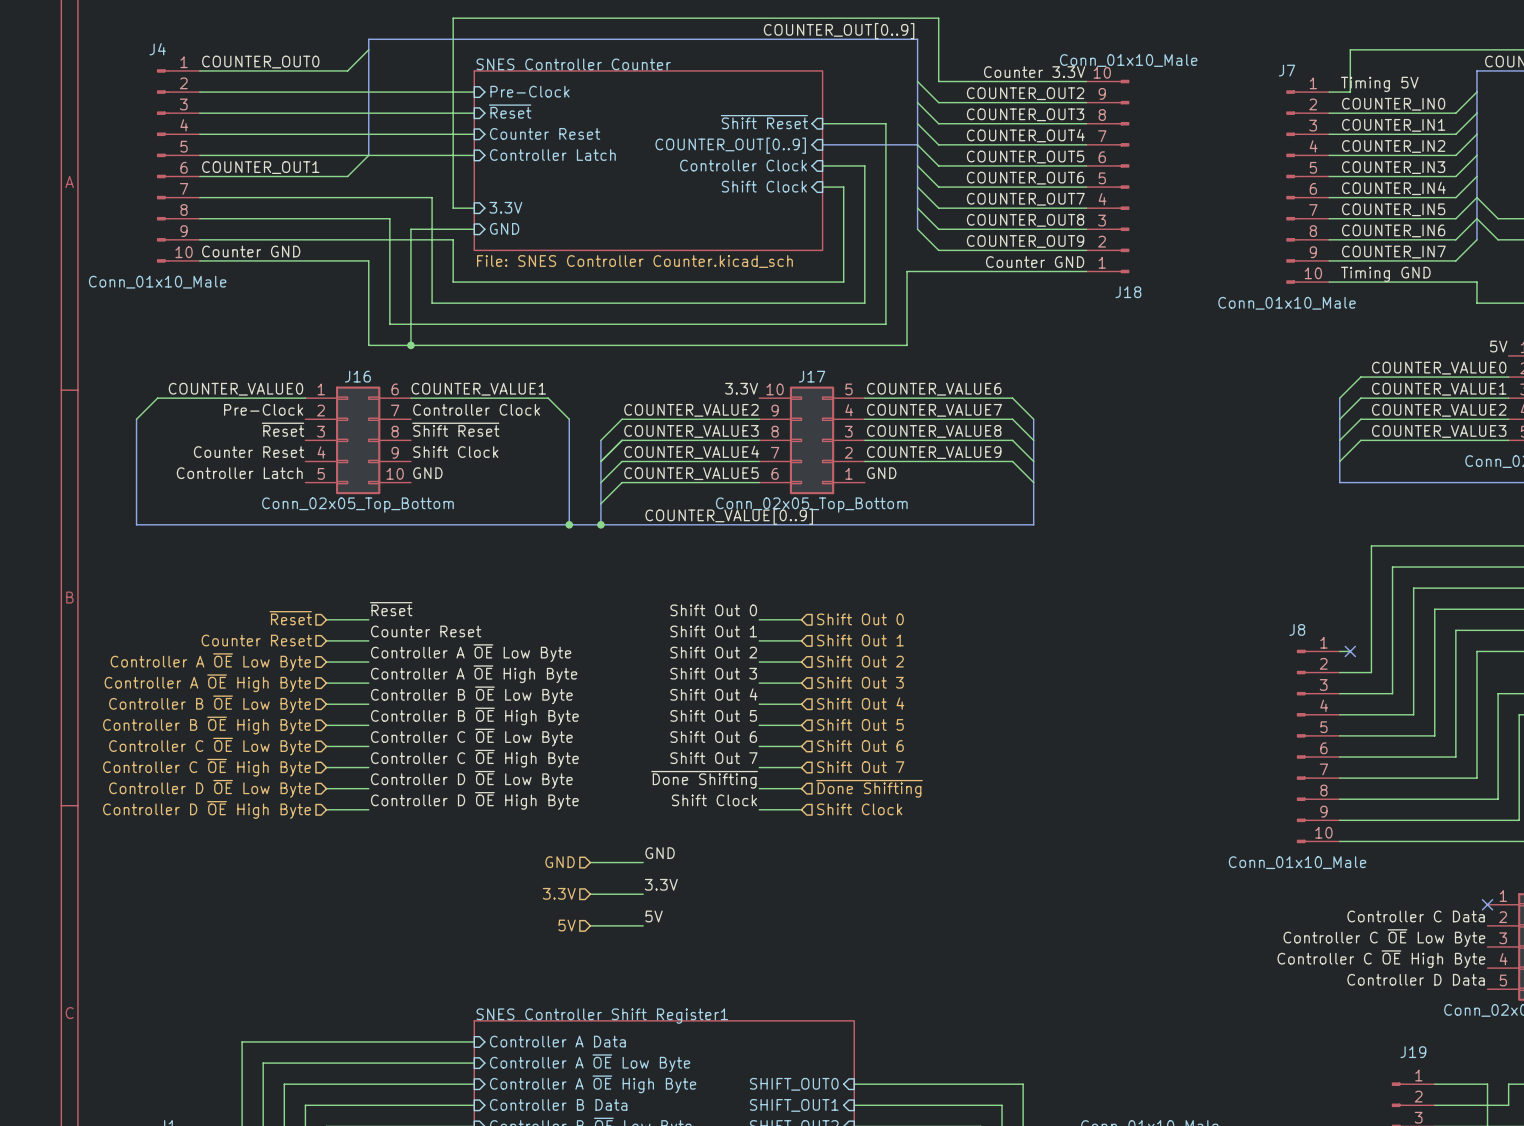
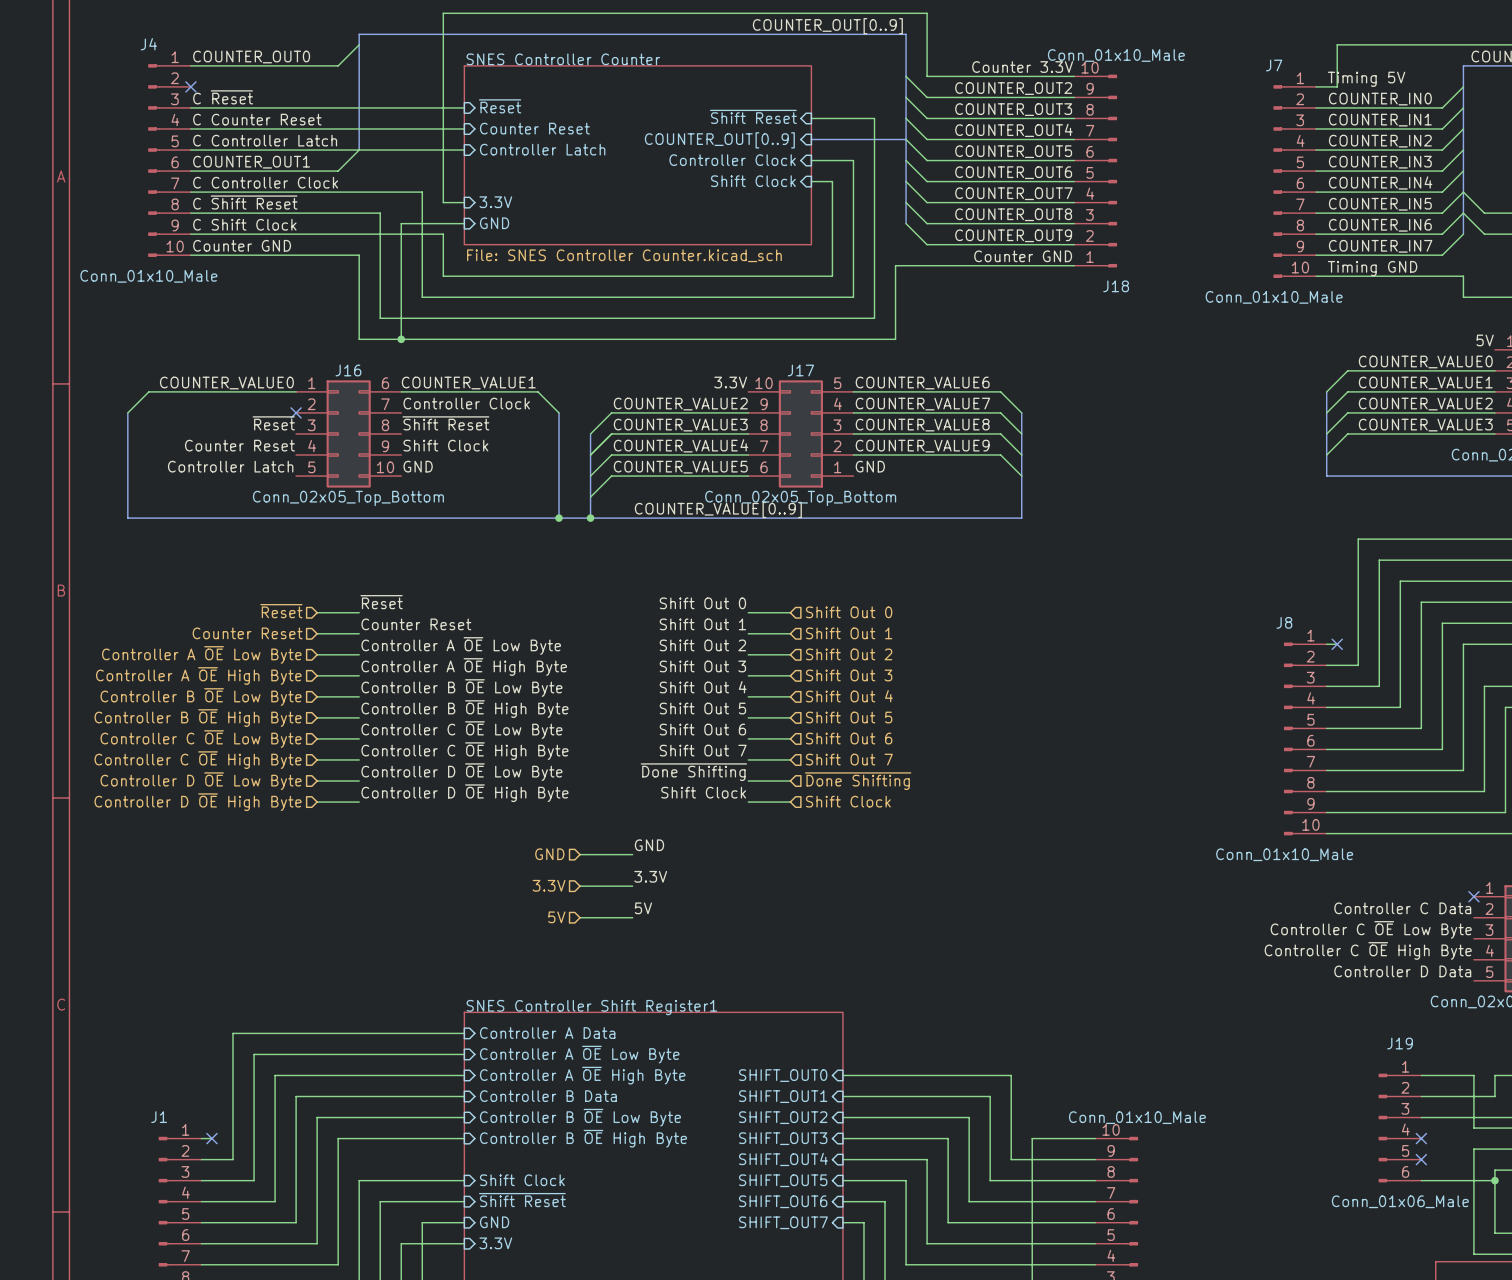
sheet pin: Pre-Clock (529, 91) -> none
wire: (199, 92) (474, 92) -> none
no-connect mark: none -> (190, 86)
label: none -> C ~{Reset} (223, 97)
label: none -> C Counter Reset (257, 119)
label: none -> C Controller Latch (265, 140)
label: none -> C Controller Clock (265, 182)
label: none -> C ~{Shift Reset} (245, 202)
label: none -> C Shift Clock (244, 224)
label: Pre-Clock (263, 409) -> none
no-connect mark: none -> (296, 412)

